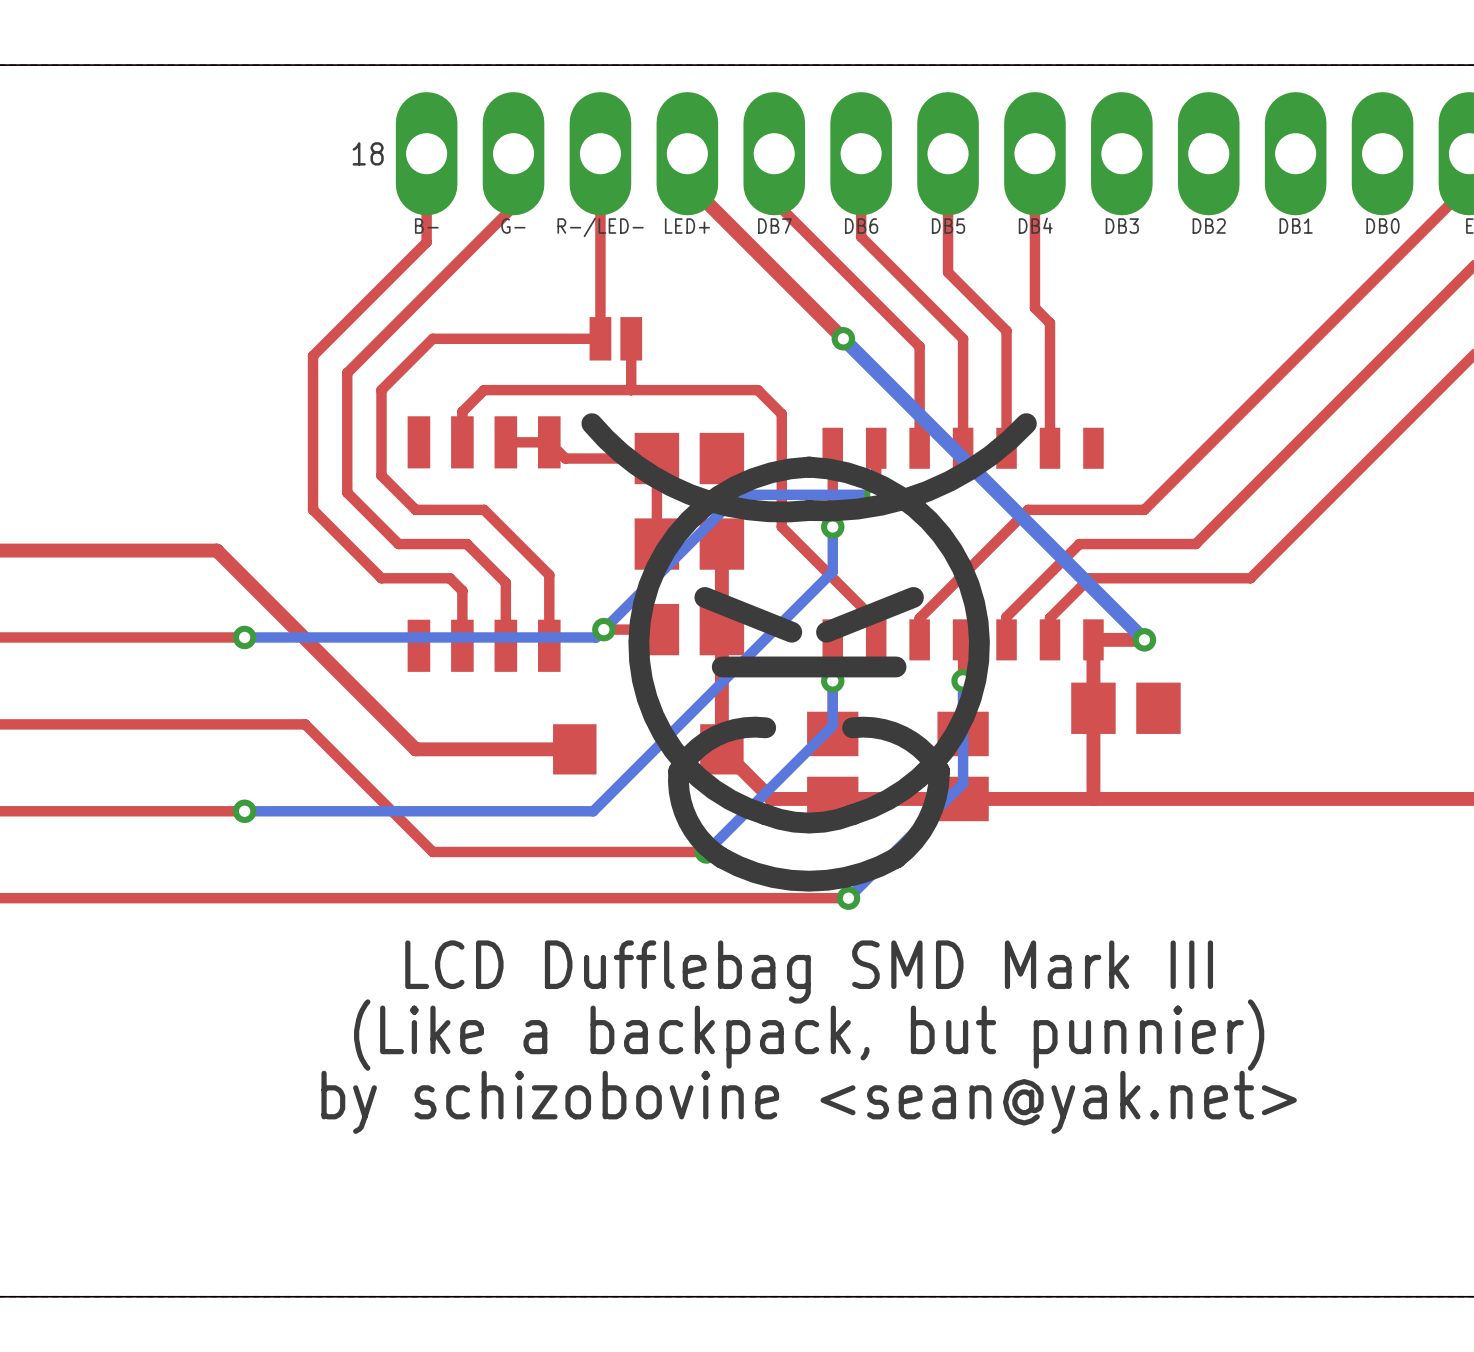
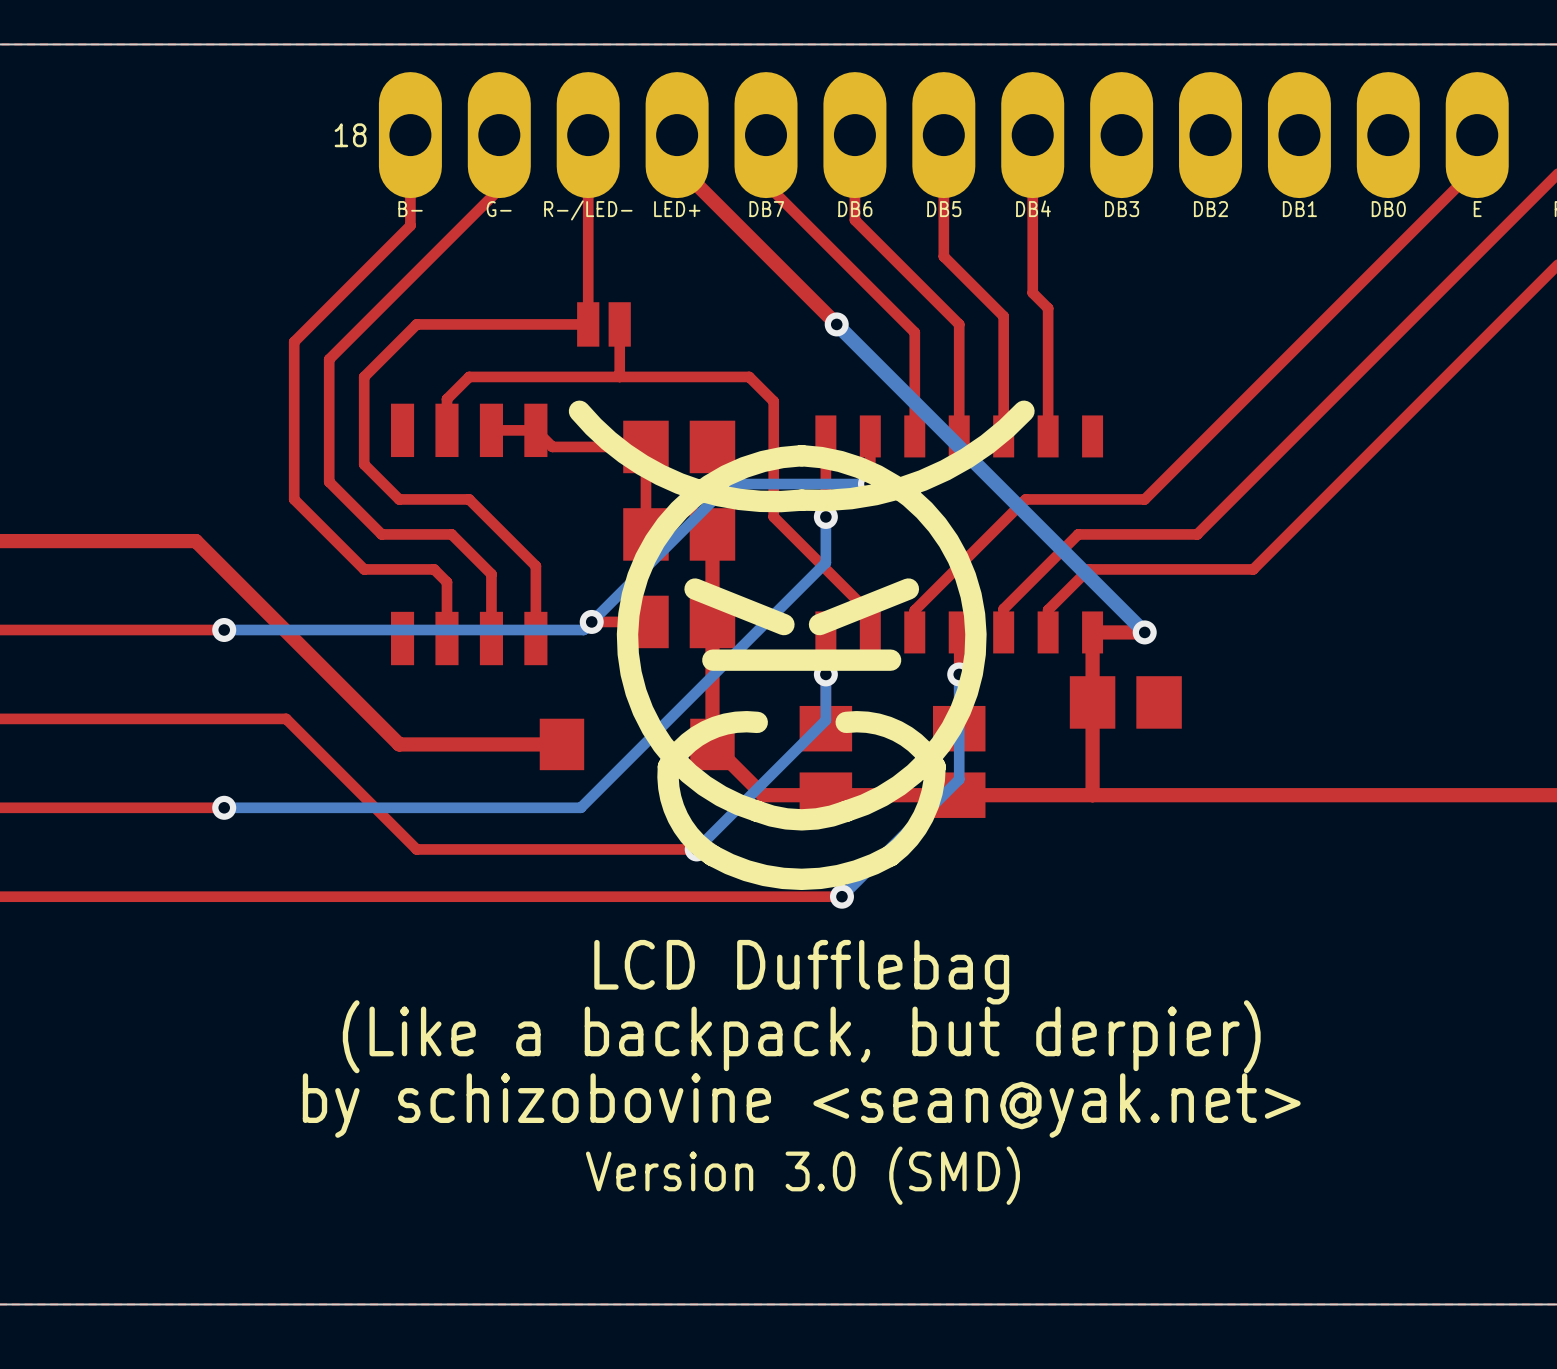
text: LCD Dufflebag SMD Mark III (809, 971) -> LCD Dufflebag (801, 972)
text: (Like a backpack, but punnier) (809, 1035) -> (Like a backpack, but derpier) (801, 1036)
text: none -> Version 3.0 (SMD) (802, 1175)

